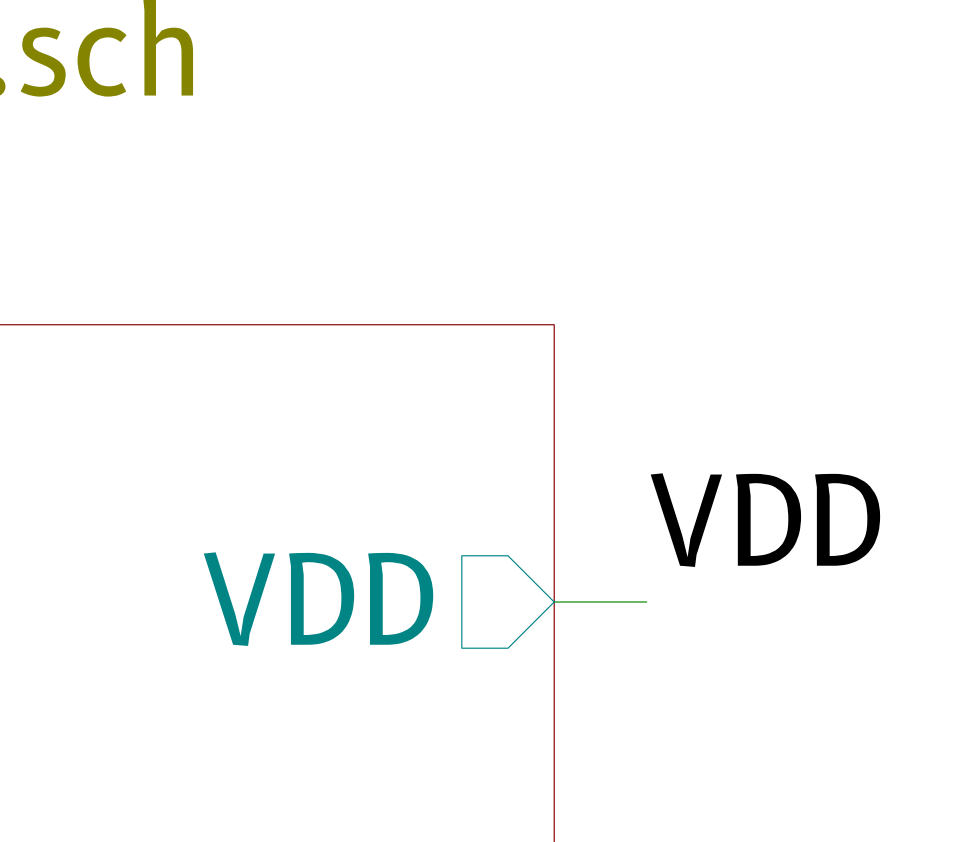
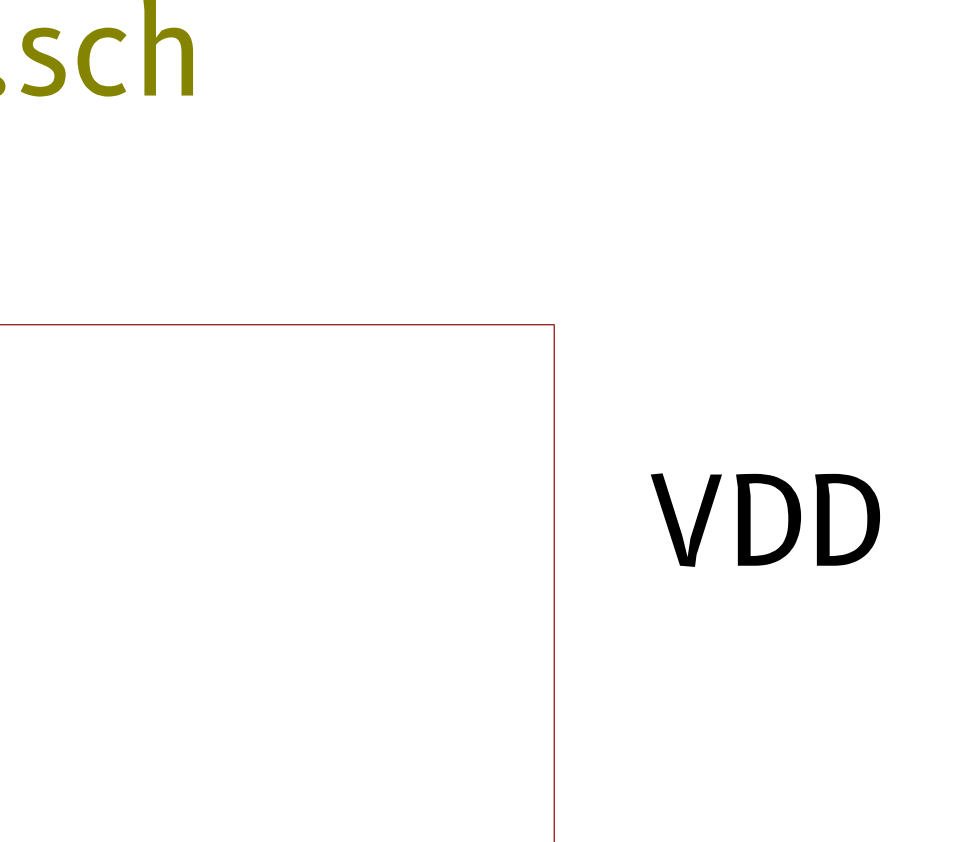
sheet pin: VDD (318, 599) -> none
wire: (554, 602) (646, 602) -> none

